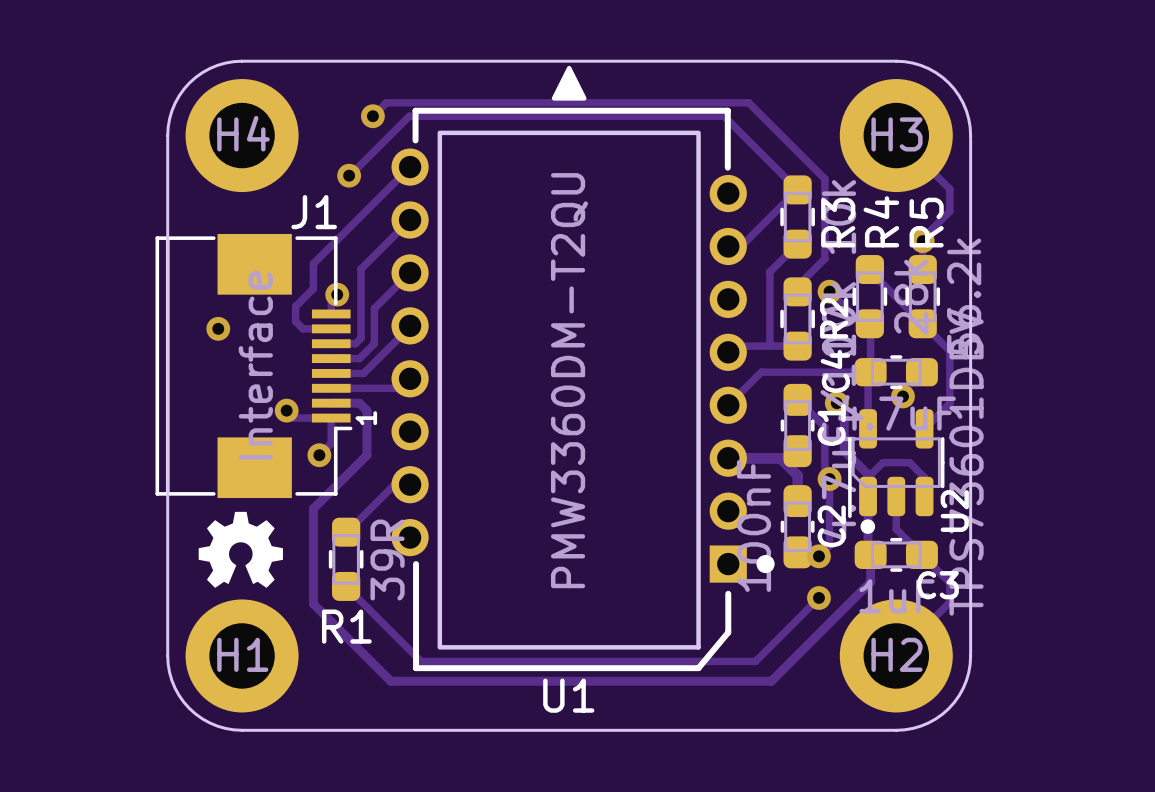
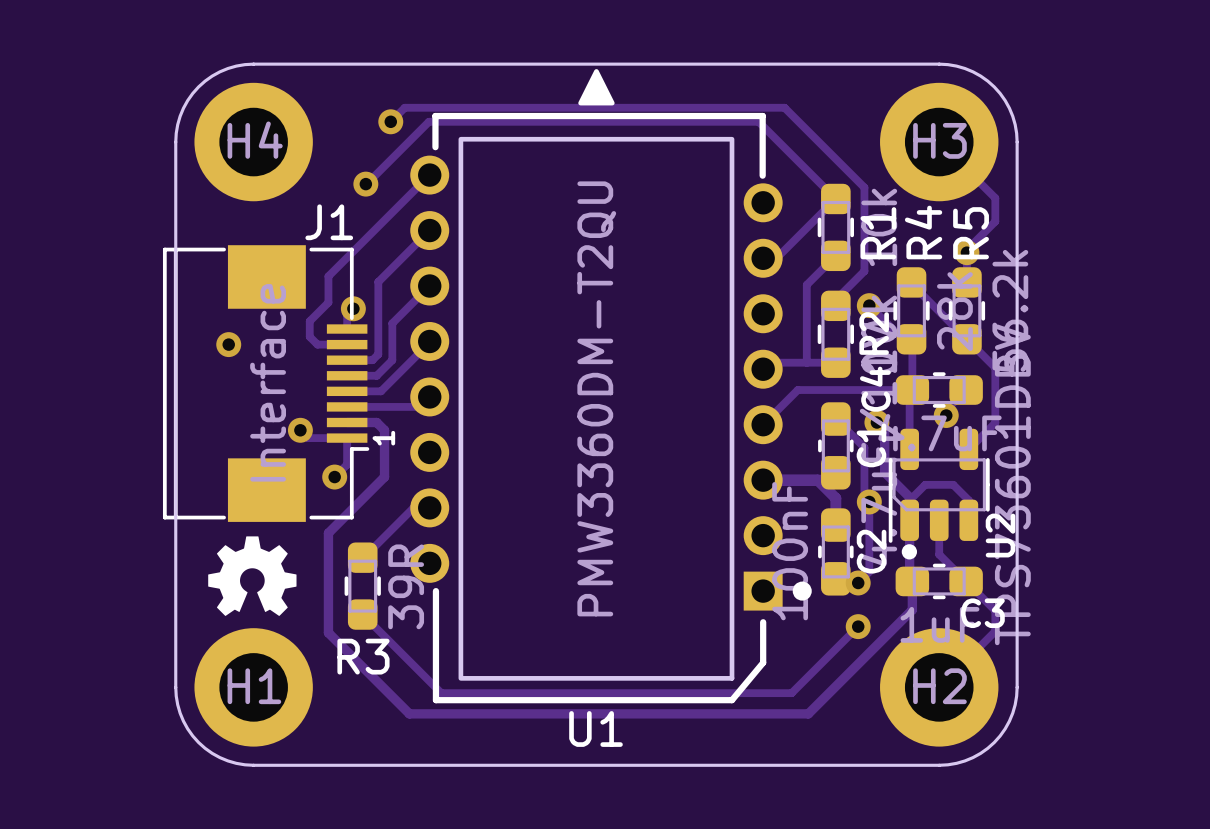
R3 name: R3 (838, 222) -> R1 (878, 233)
R1 name: R1 (346, 626) -> R3 (363, 656)

